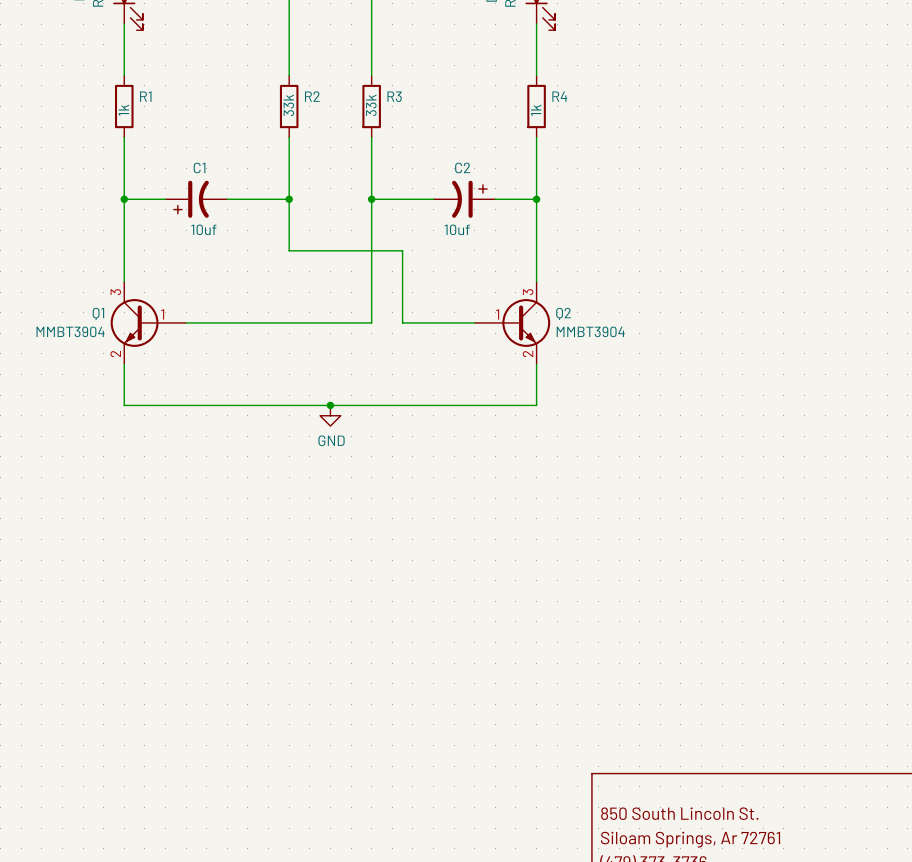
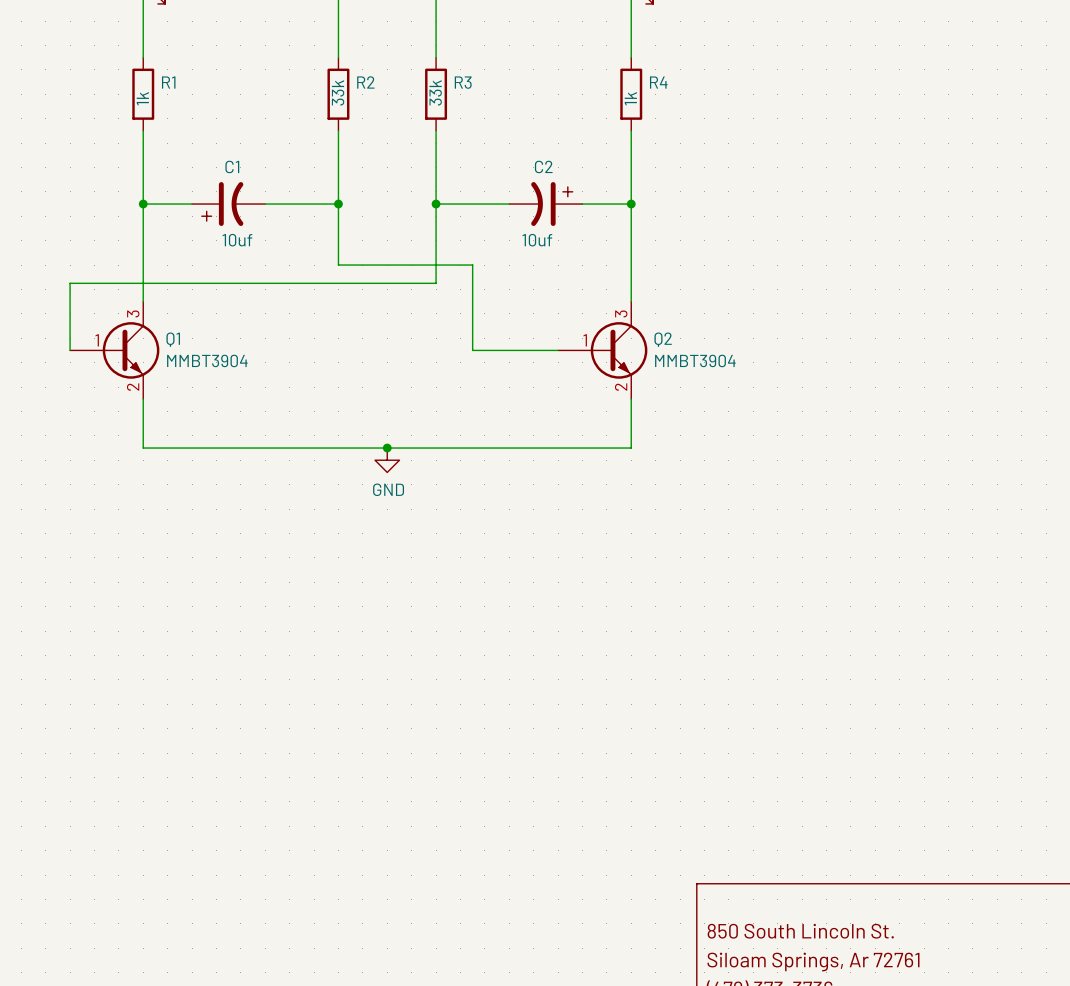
wire: (371, 266) (371, 322) (186, 322) -> (436, 283) (70, 283) (70, 350)
Q1 flip: as is (134, 322) -> left-right (131, 350)

